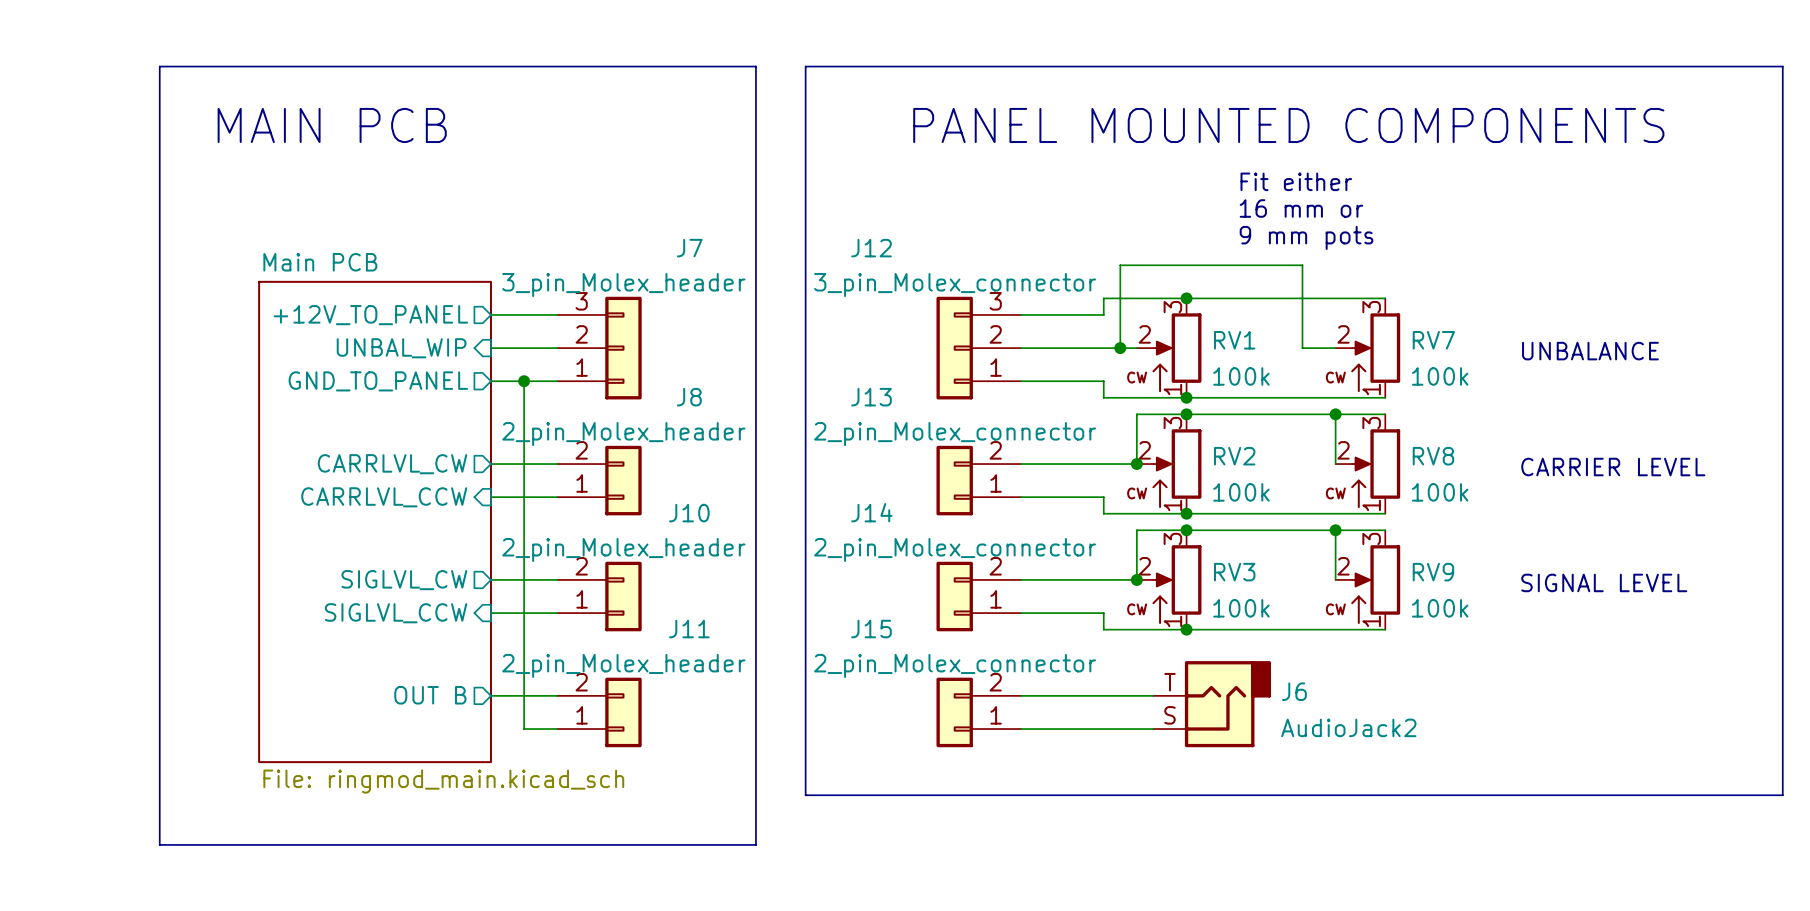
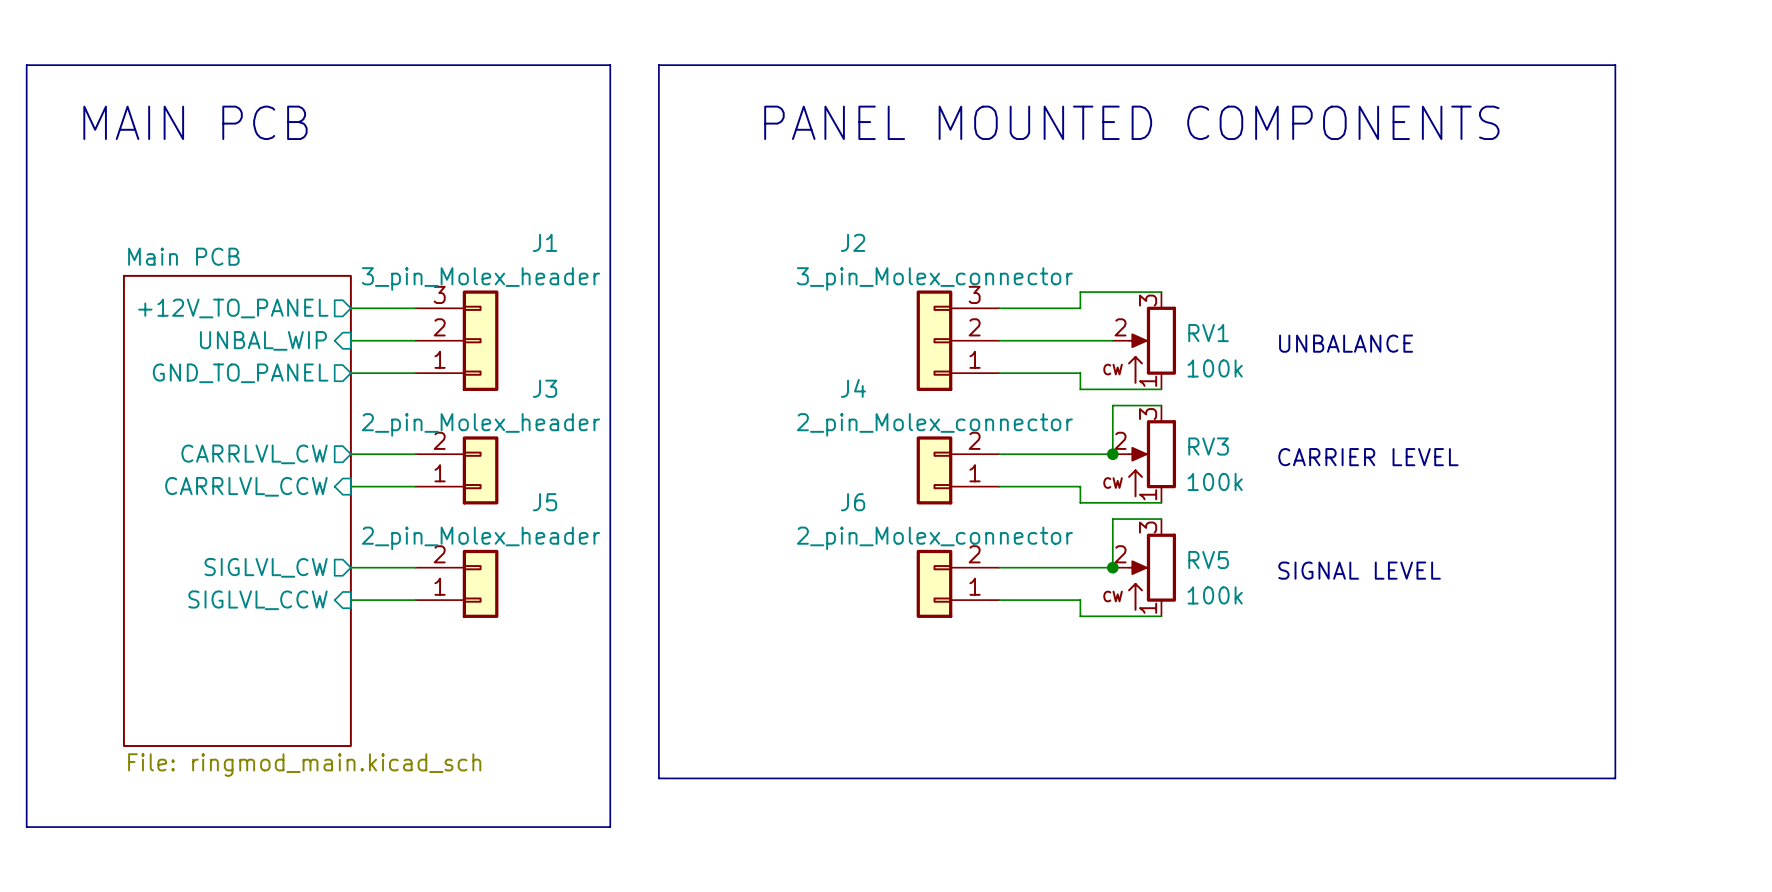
line: (159, 66) (159, 844) -> (156, 65) (26, 65) (26, 827) (156, 827)
line: (623, 66) (673, 66) -> (739, 65) (788, 65)
line: (755, 66) (755, 844) (623, 844) -> (610, 65) (610, 827)
line: (805, 66) (805, 795) -> (658, 65) (658, 778) (788, 778)
line: (1650, 66) (1782, 66) (1782, 795) (1650, 795) -> (1615, 65) (1615, 778)
text position: MAIN PCB (332, 125) -> MAIN PCB (195, 122)
text position: PANEL MOUNTED COMPONENTS (1288, 125) -> PANEL MOUNTED COMPONENTS (1131, 122)
text: Fit either (1296, 181) -> none
text: 16 mm or (1301, 208) -> none
text: 9 mm pots (1306, 237) -> none
J12 name: J12 (871, 248) -> J2 (853, 242)
wire: (1186, 298) (1385, 298) -> none
junction: (1186, 298) -> none
wire: (490, 314) (557, 314) -> (350, 308) (415, 308)
sheet pin position: +12V_TO_PANEL (370, 315) -> +12V_TO_PANEL (233, 308)
sheet pin position: UNBAL_WIP (401, 348) -> UNBAL_WIP (263, 340)
J1: none -> 3_pin_Molex_header (457, 340)
wire: (490, 348) (557, 348) -> (350, 340) (415, 340)
J7: 3_pin_Molex_header (599, 348) -> none
wire: (1120, 348) (1120, 265) (1302, 265) (1302, 348) (1335, 348) -> none
junction: (1120, 348) -> none
RV7: 100k (1367, 348) -> none
text position: UNBALANCE (1590, 351) -> UNBALANCE (1346, 343)
sheet pin position: GND_TO_PANEL (378, 381) -> GND_TO_PANEL (240, 373)
wire: (490, 381) (557, 381) -> (350, 373) (415, 373)
wire: (524, 381) (524, 729) (557, 729) -> none
junction: (524, 381) -> none
J13 name: J13 (871, 397) -> J4 (853, 388)
wire: (1186, 397) (1385, 397) -> none
junction: (1186, 397) -> none
wire: (1186, 414) (1385, 414) -> none
junction: (1186, 414) -> none
wire: (1335, 414) (1335, 464) -> none
junction: (1335, 414) -> none
RV2 name: RV2 (1234, 456) -> RV3 (1208, 446)
sheet pin position: CARRLVL_CW (392, 464) -> CARRLVL_CW (254, 454)
wire: (490, 464) (557, 464) -> (350, 454) (415, 454)
RV8: 100k (1367, 464) -> none
text position: CARRIER LEVEL (1613, 467) -> CARRIER LEVEL (1368, 457)
J3: none -> 2_pin_Molex_header (457, 470)
J8: 2_pin_Molex_header (599, 480) -> none
sheet pin position: CARRLVL_CCW (384, 497) -> CARRLVL_CCW (246, 486)
wire: (490, 497) (557, 497) -> (350, 486) (415, 486)
J14 name: J14 (871, 512) -> J6 (853, 502)
wire: (1186, 513) (1385, 513) -> none
junction: (1186, 513) -> none
sheet Main PCB position: (375, 521) -> (237, 510)
wire: (1186, 530) (1385, 530) -> none
junction: (1186, 530) -> none
wire: (1335, 530) (1335, 579) -> none
junction: (1335, 530) -> none
RV3 name: RV3 (1234, 572) -> RV5 (1208, 560)
wire: (490, 579) (557, 579) -> (350, 567) (415, 567)
RV9: 100k (1367, 579) -> none
sheet pin position: SIGLVL_CW (404, 580) -> SIGLVL_CW (266, 567)
text position: SIGNAL LEVEL (1604, 582) -> SIGNAL LEVEL (1359, 570)
J5: none -> 2_pin_Molex_header (457, 583)
J10: 2_pin_Molex_header (599, 596) -> none
sheet pin position: SIGLVL_CCW (396, 613) -> SIGLVL_CCW (258, 600)
wire: (490, 613) (557, 613) -> (350, 600) (415, 600)
wire: (1186, 629) (1385, 629) -> none
junction: (1186, 629) -> none
sheet pin: OUT B (430, 695) -> none
wire: (490, 695) (557, 695) -> none
wire: (1020, 695) (1153, 695) -> none
J6: AudioJack2 (1212, 704) -> none
J11: 2_pin_Molex_header (599, 712) -> none
J15: 2_pin_Molex_connector (978, 712) -> none
wire: (1020, 729) (1153, 729) -> none

